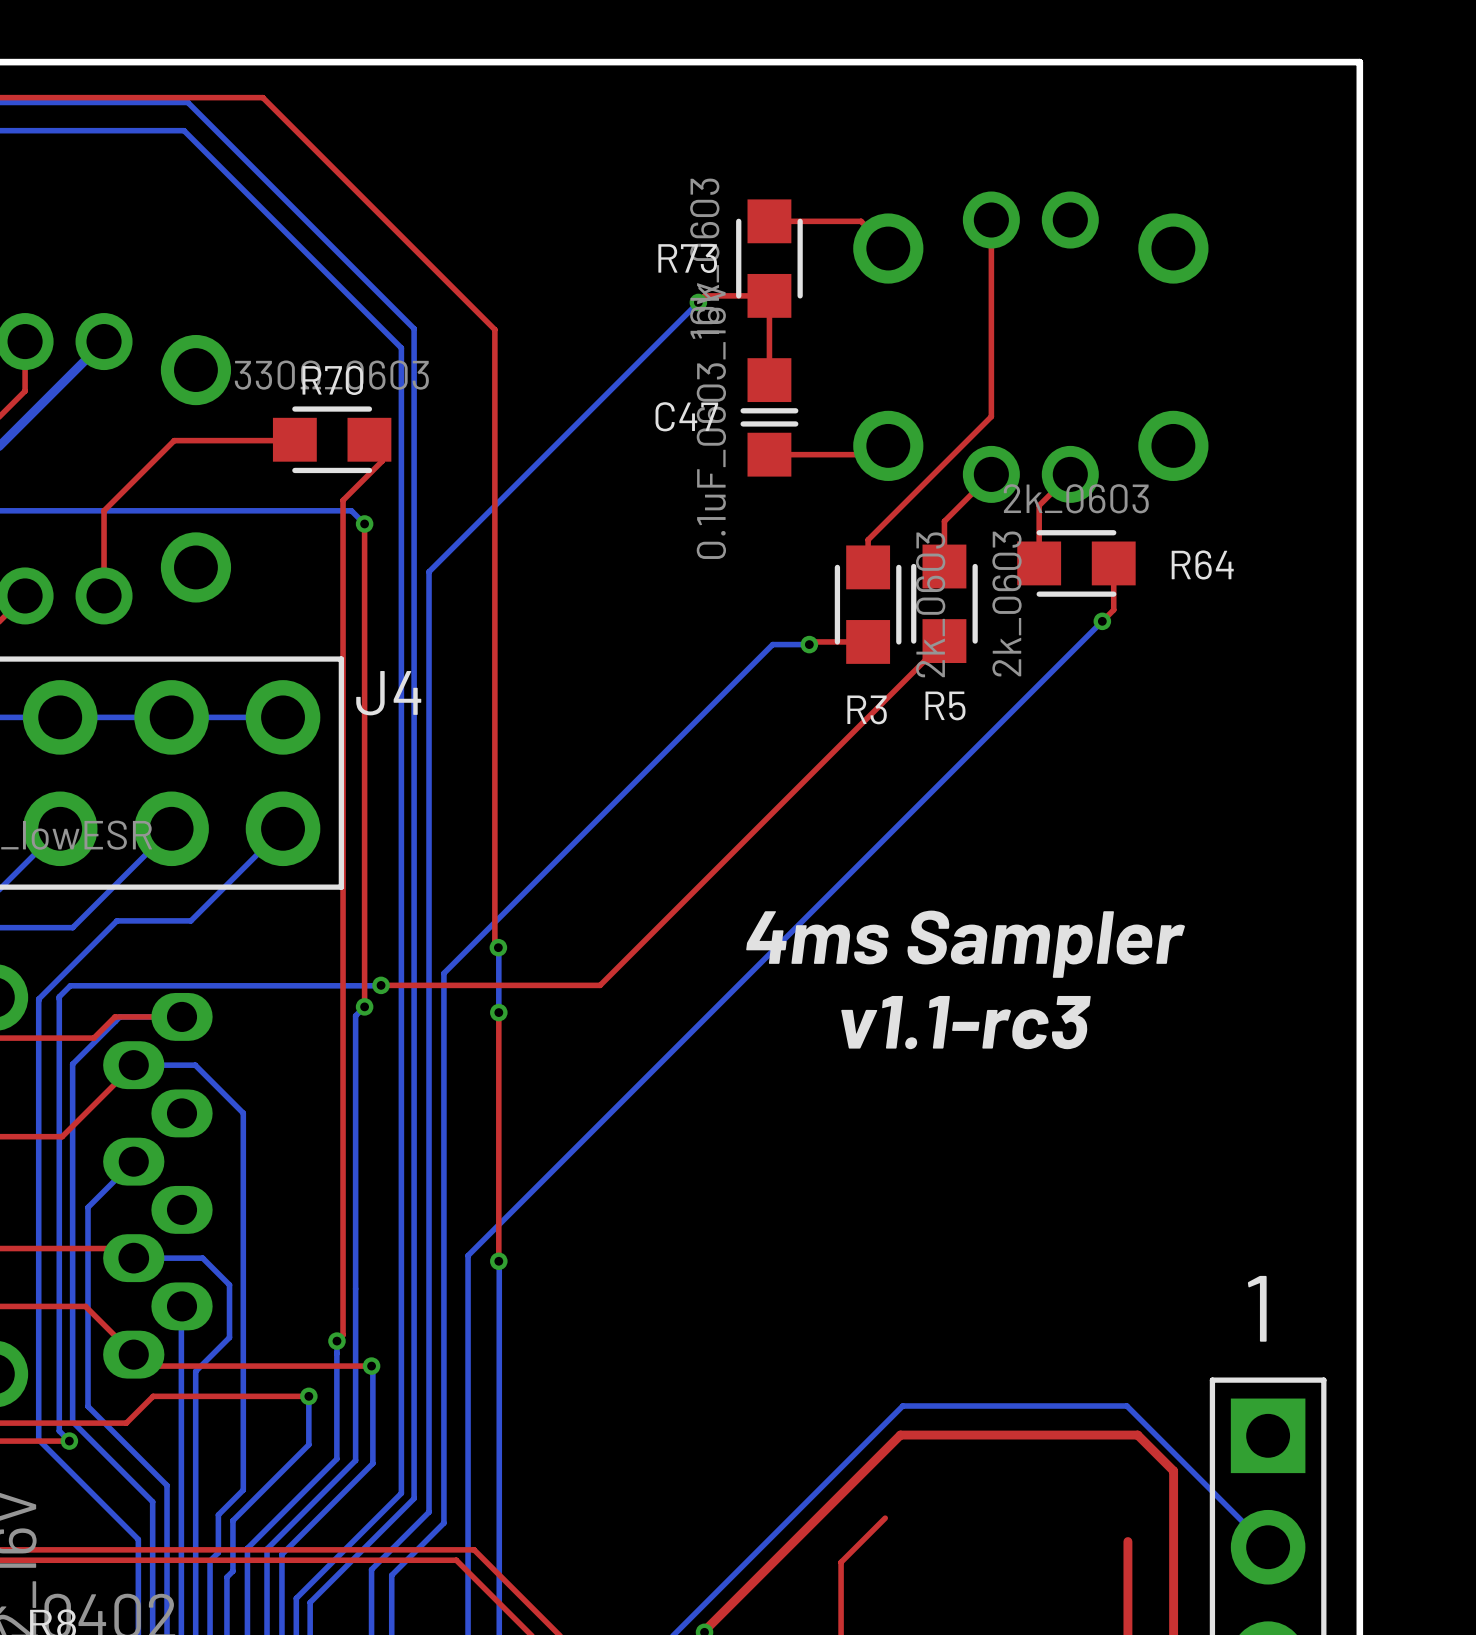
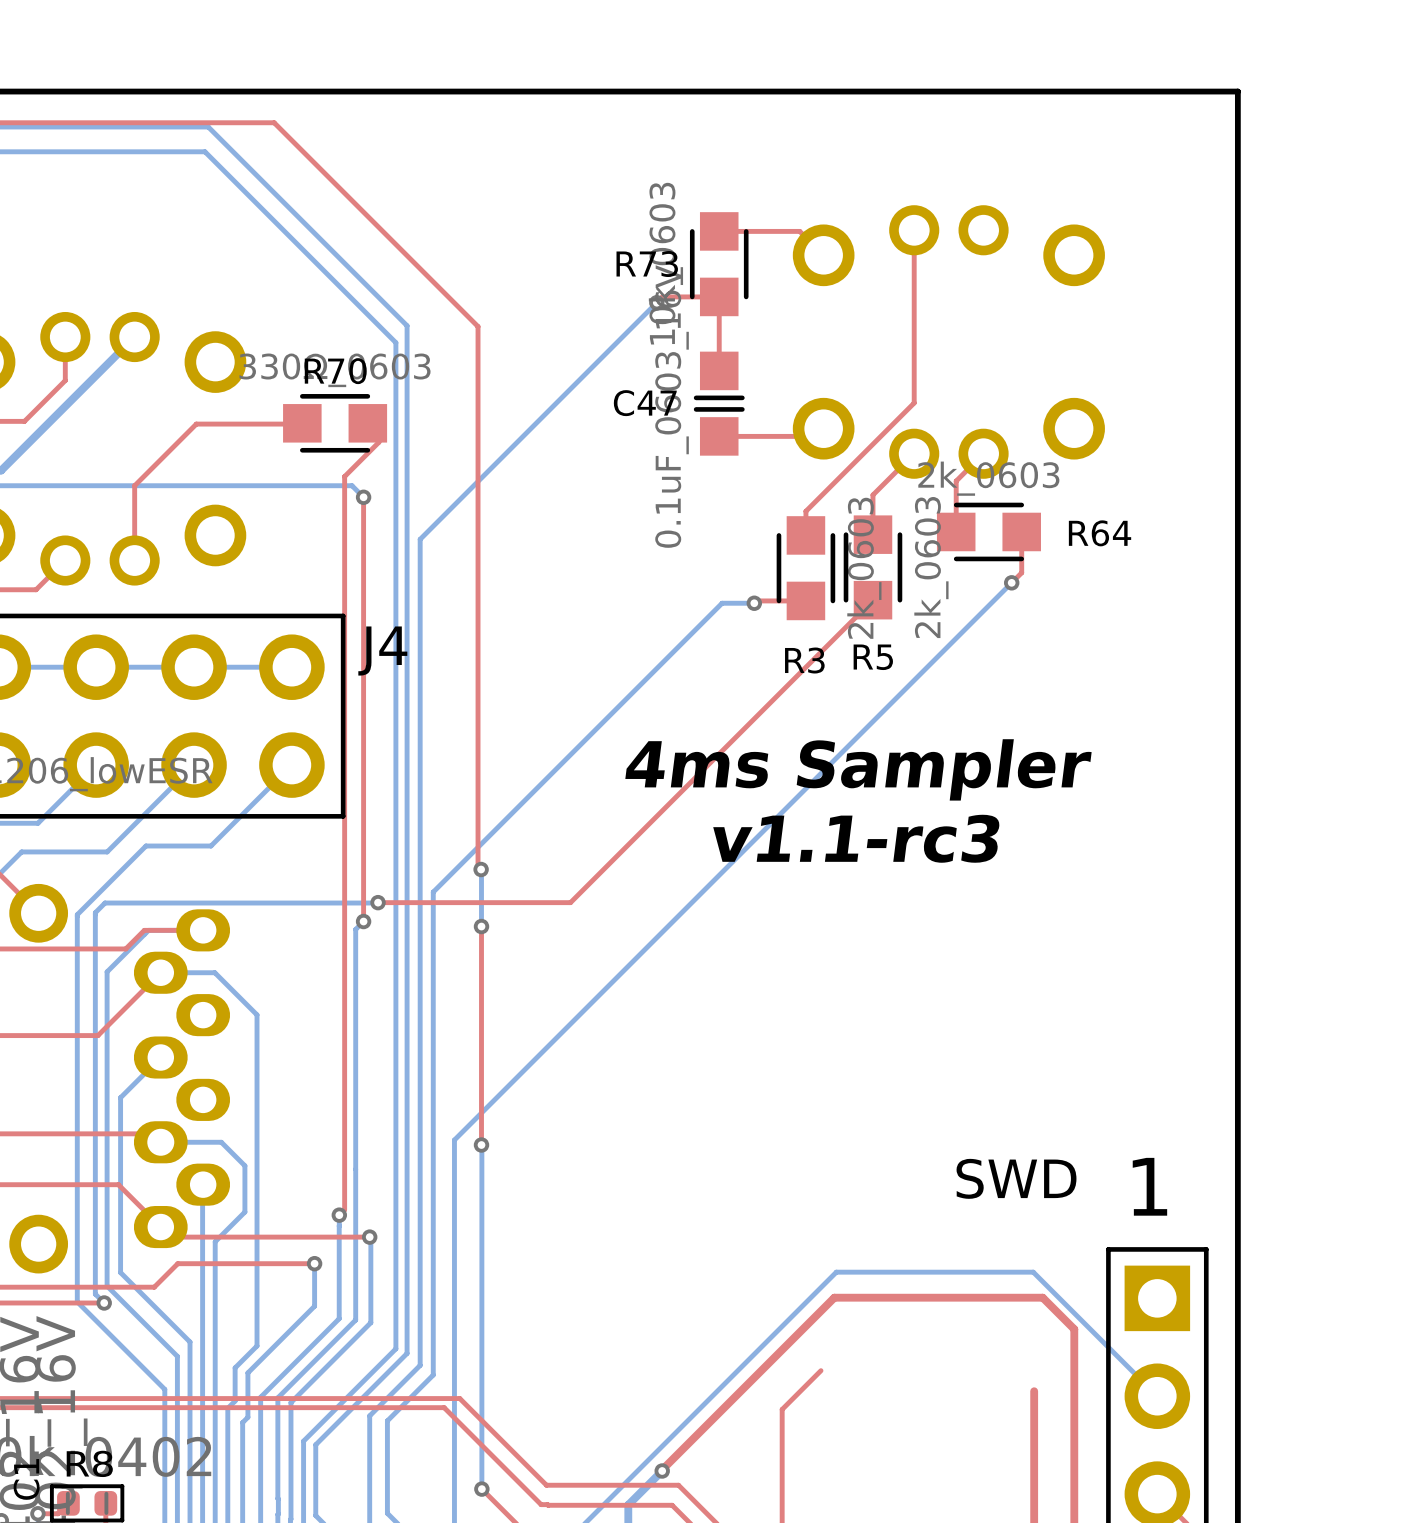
text position: 4ms Sampler (965, 944) -> 4ms Sampler (858, 769)
text position: v1.1-rc3 (965, 1022) -> v1.1-rc3 (856, 838)
text: none -> SWD (1016, 1178)

